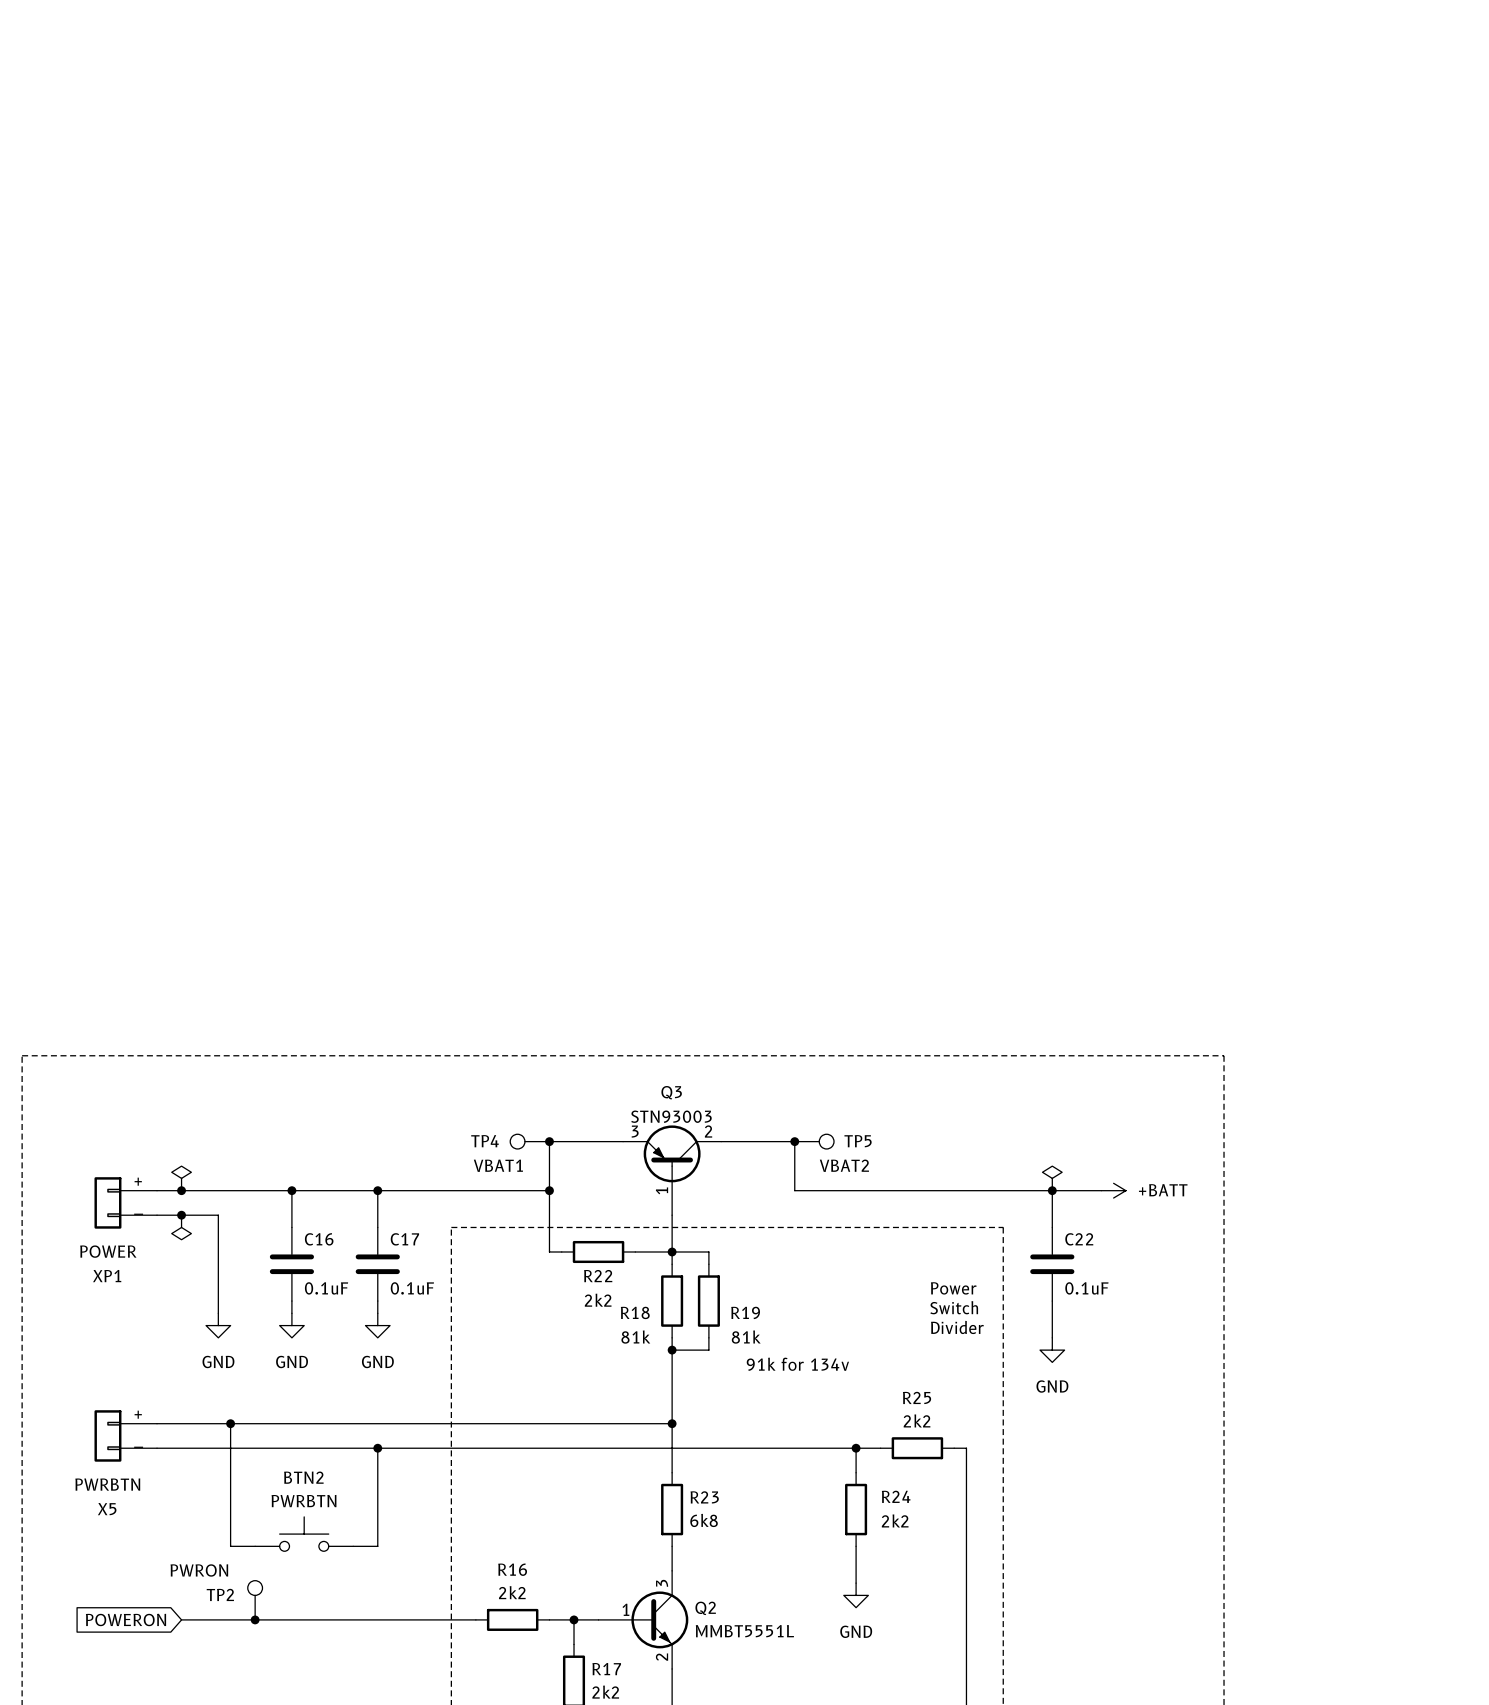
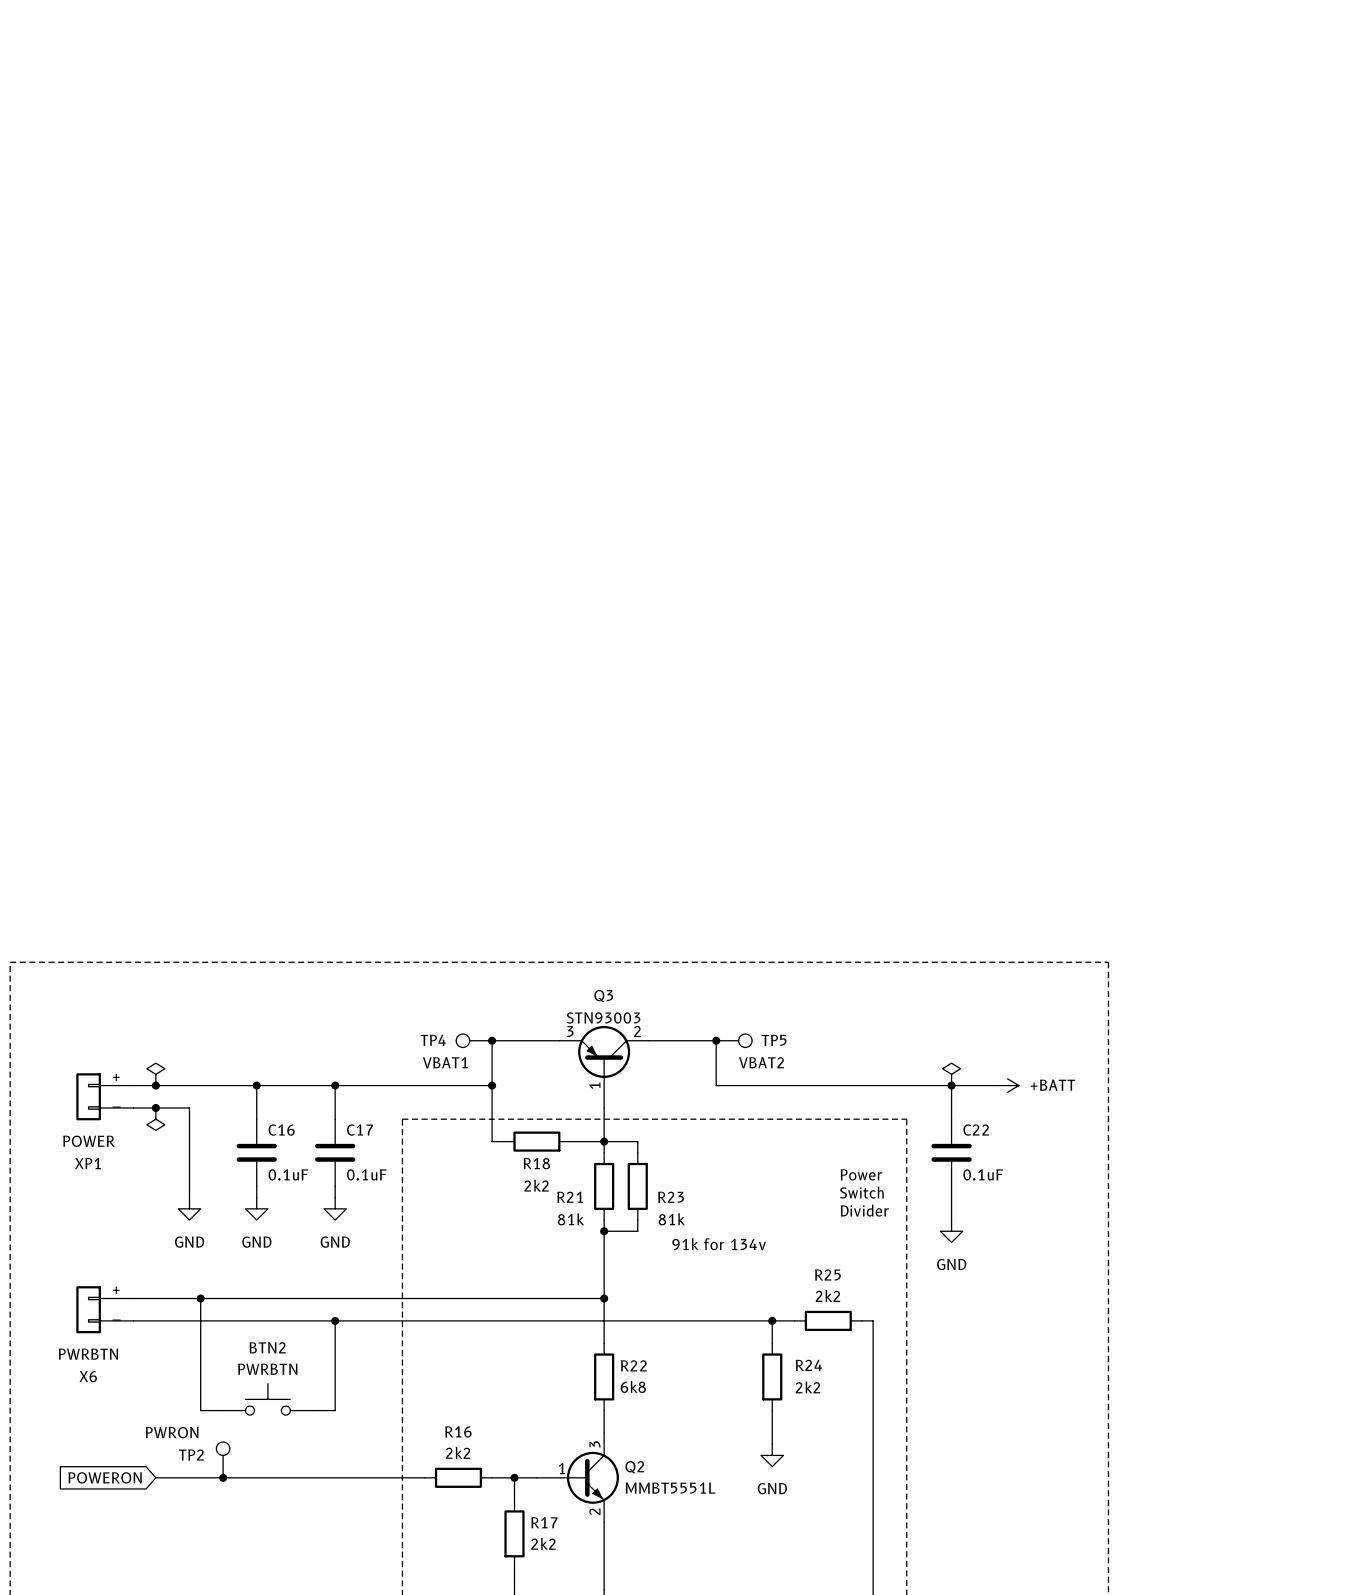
R22 name: R22 (598, 1276) -> R18 (536, 1163)
R18 name: R18 (635, 1312) -> R21 (570, 1197)
R19 name: R19 (745, 1312) -> R23 (671, 1197)
R23 name: R23 (704, 1497) -> R22 (633, 1365)
X5 name: X5 (107, 1509) -> X6 (88, 1376)

